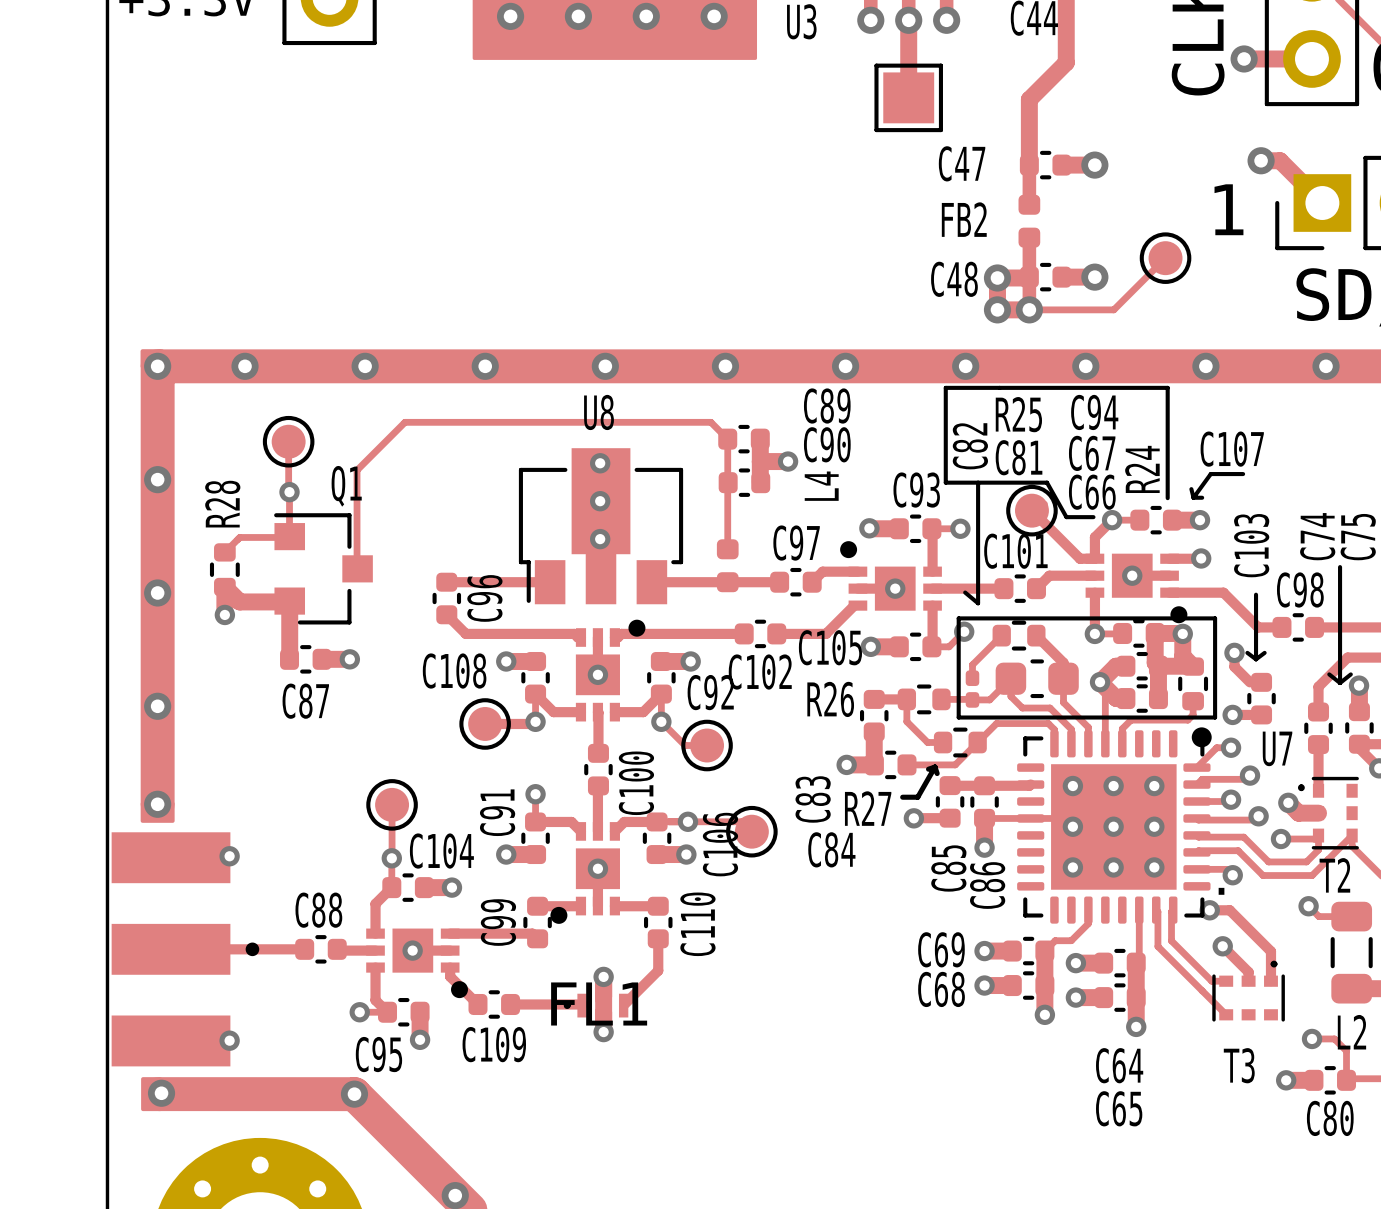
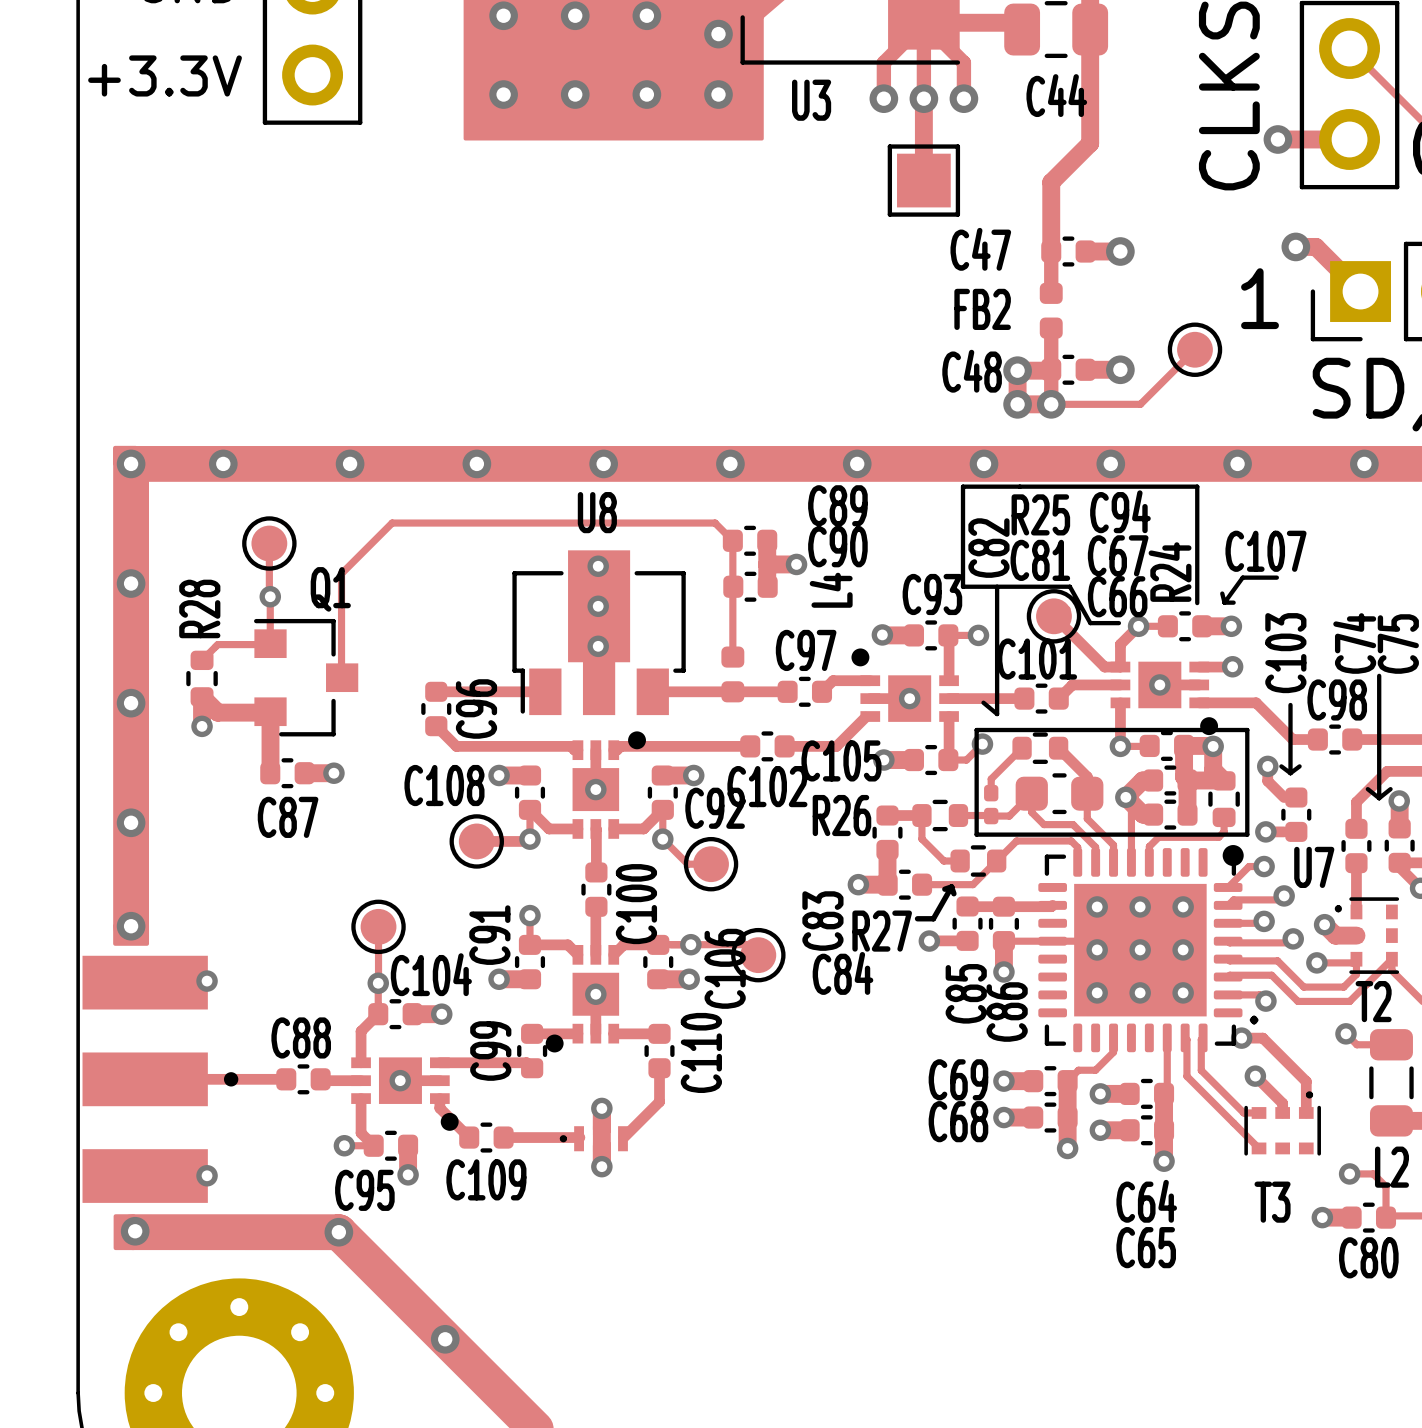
FL1 name: FL1 (599, 1003) -> none

